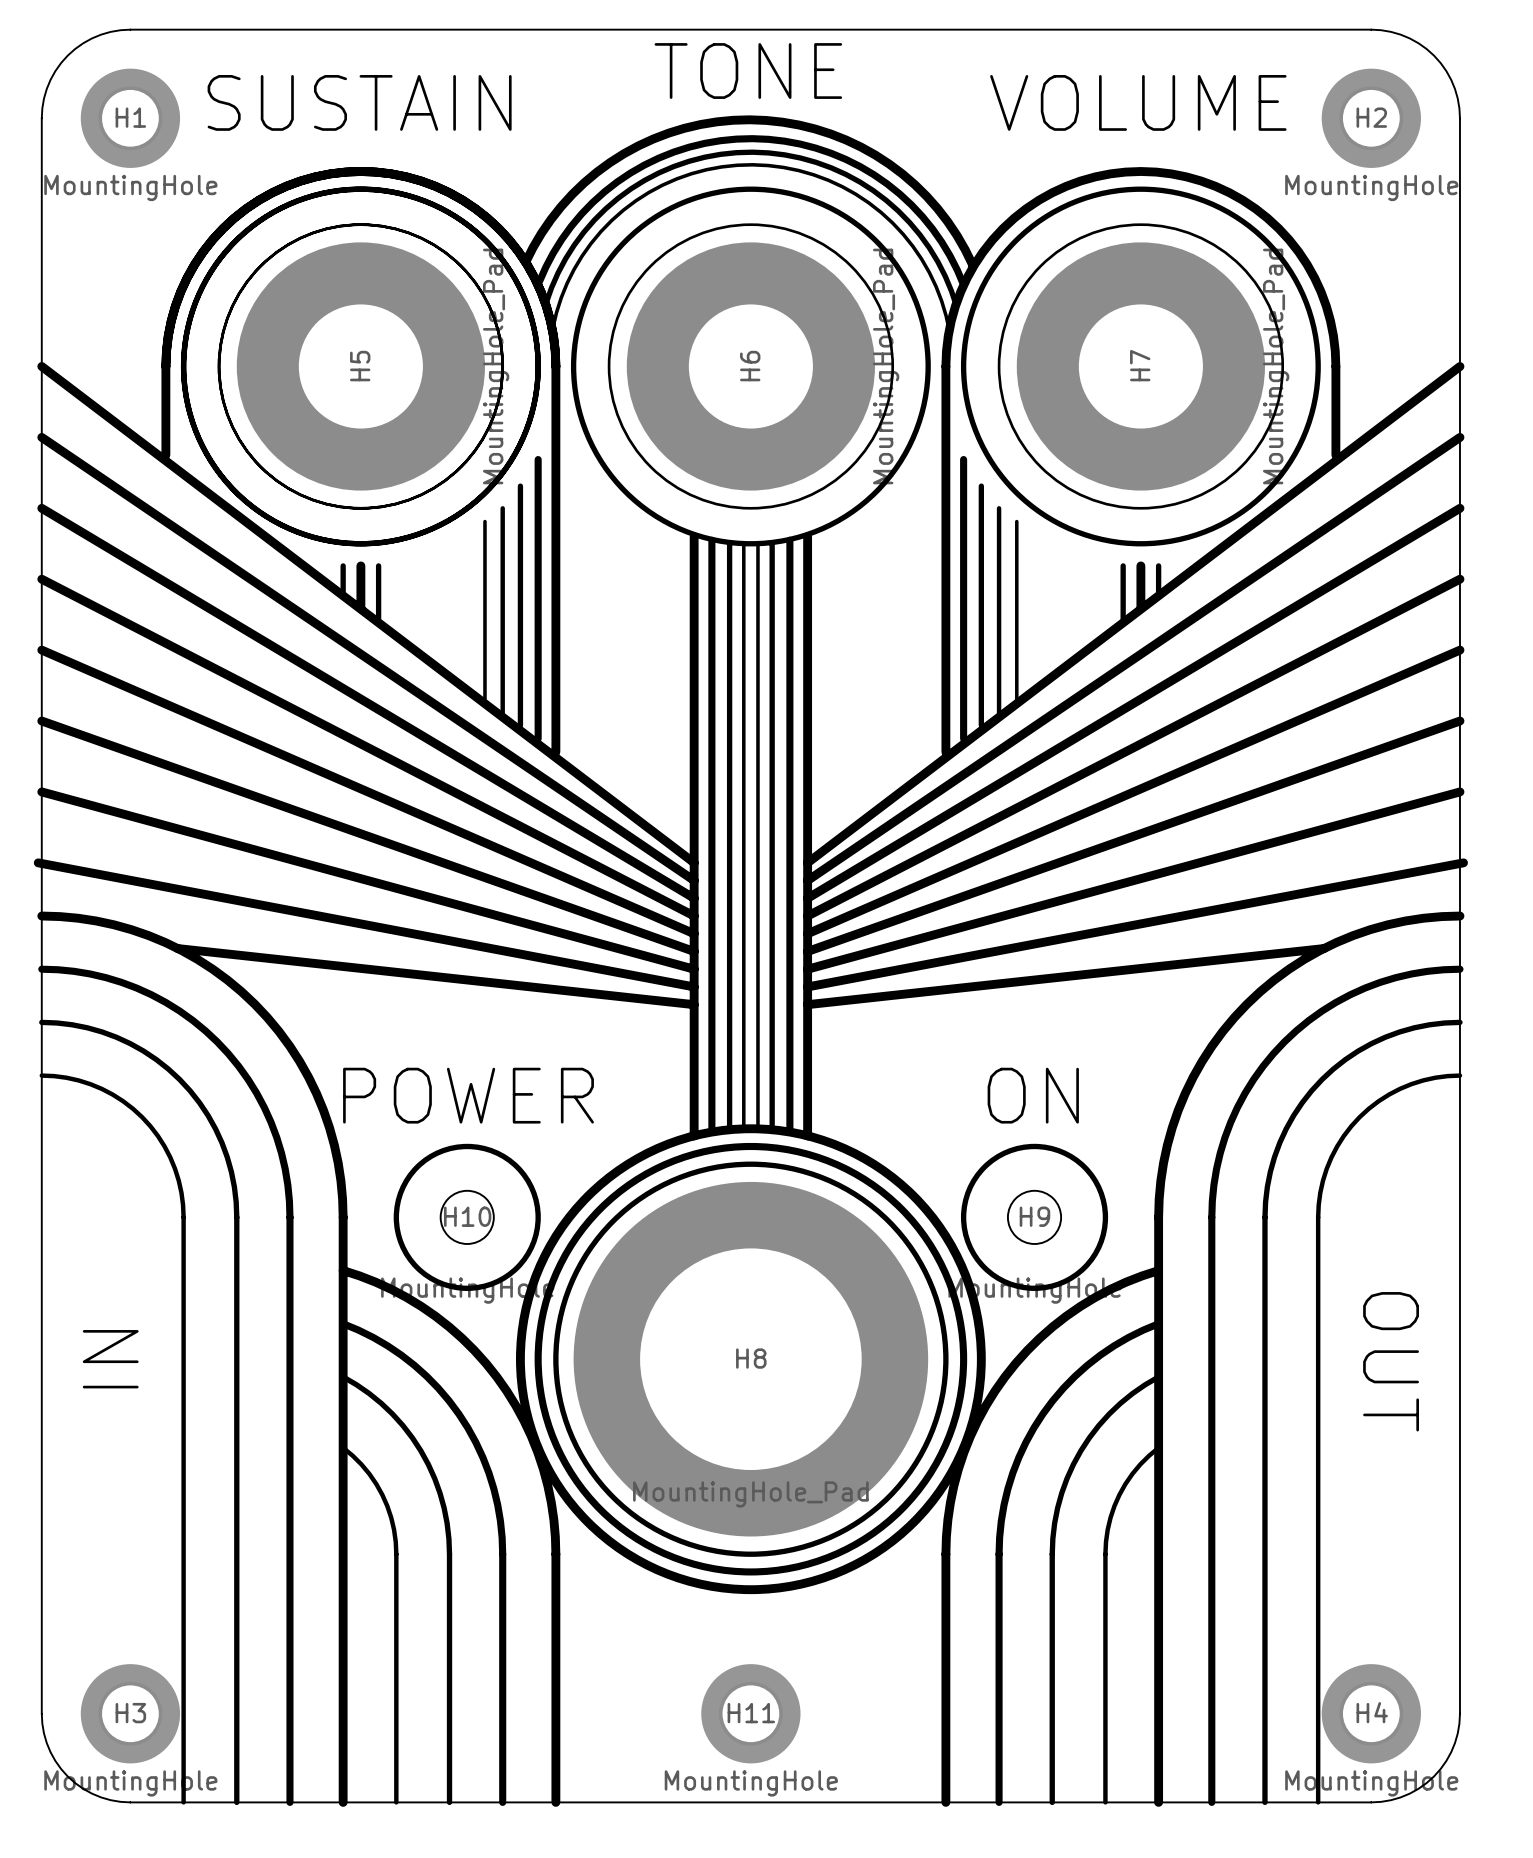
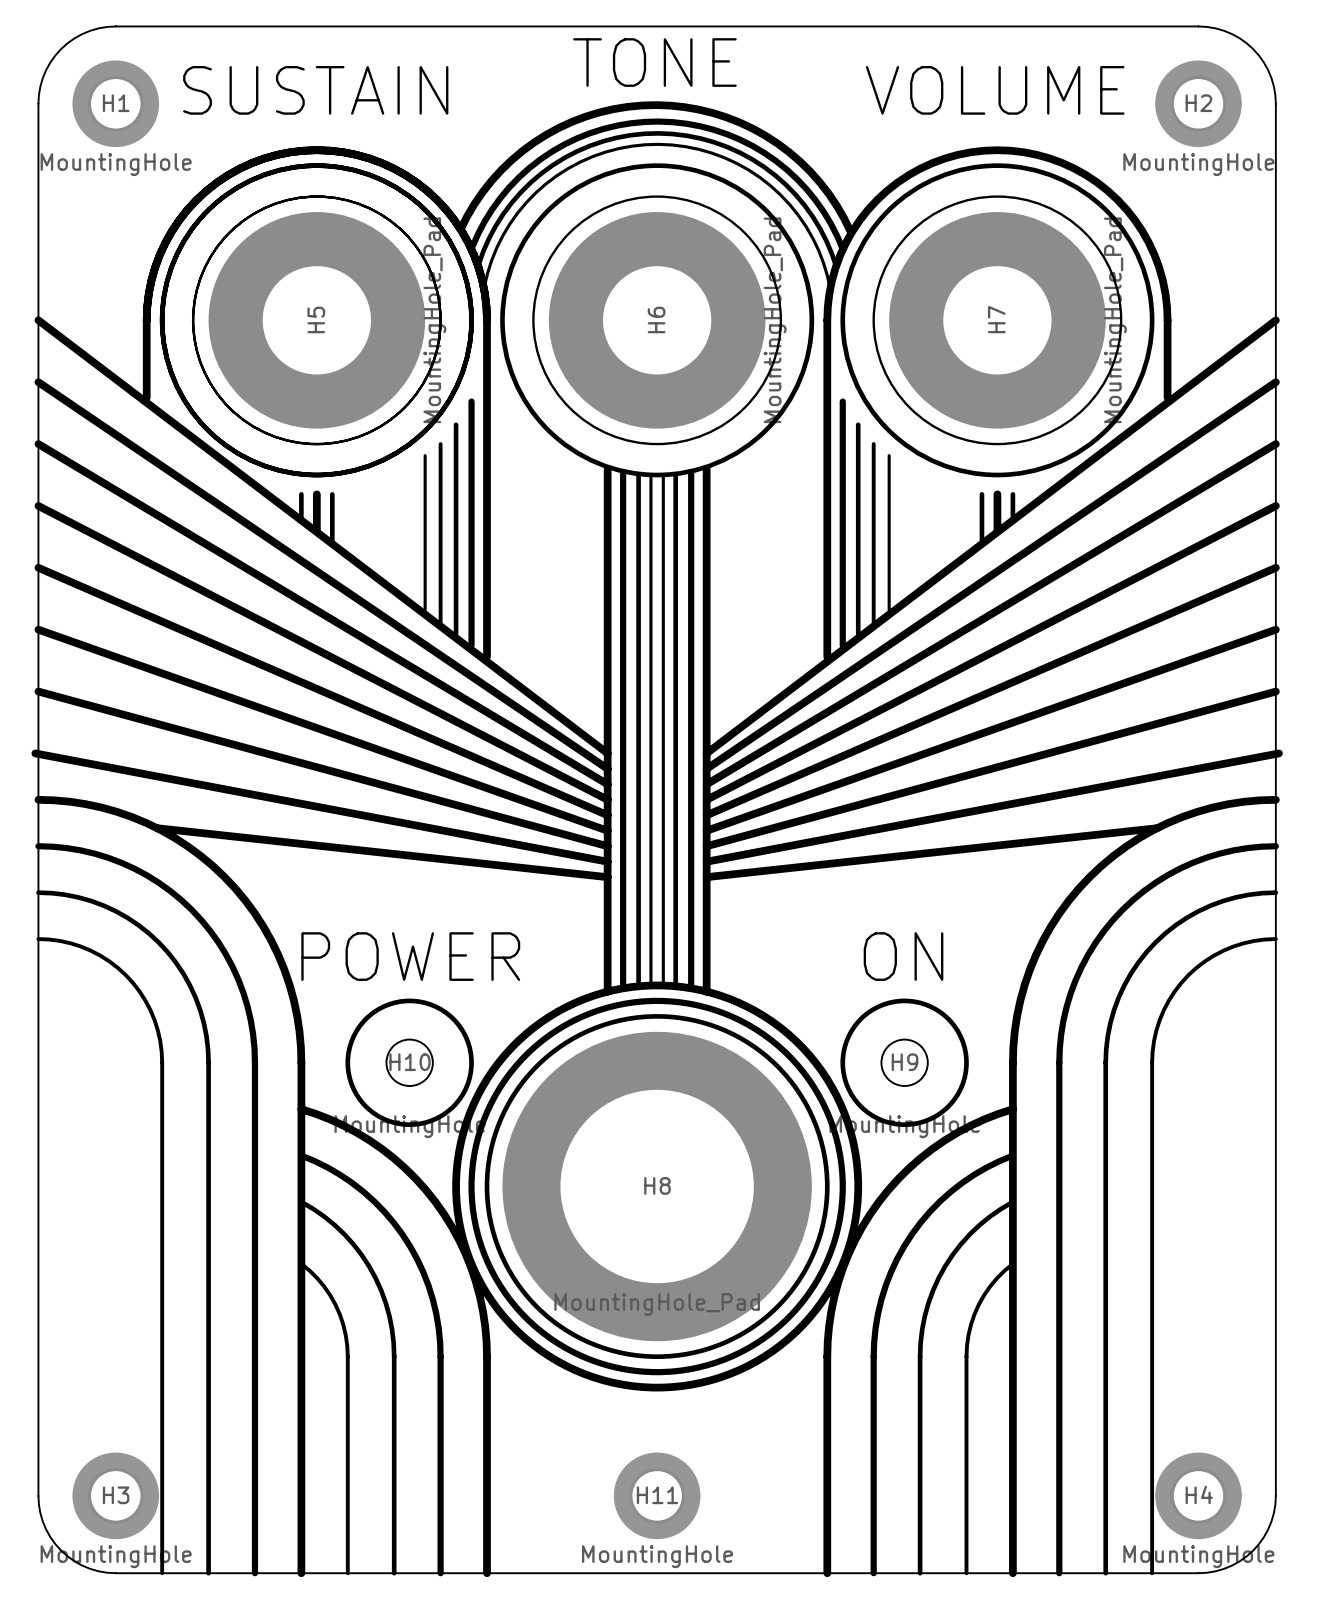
text: IN (110, 1359) -> none
text: OUT (1391, 1361) -> none

